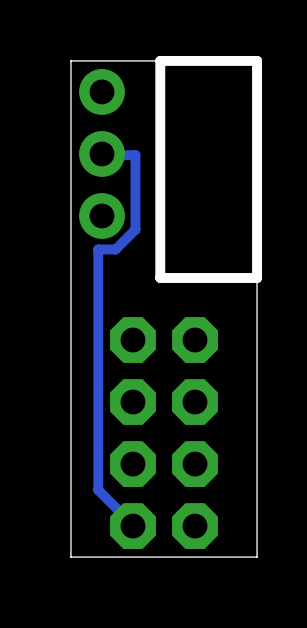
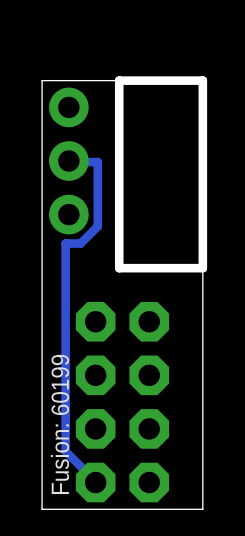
text: none -> Fusion: 60199 (59, 424)

